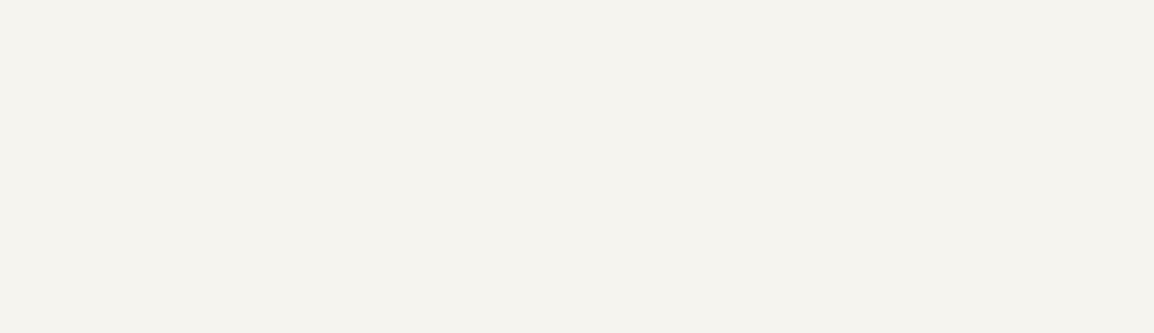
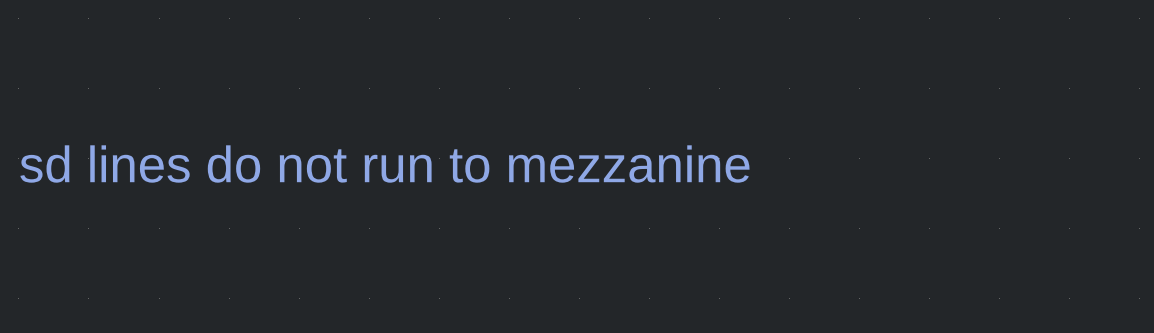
text: none -> sd lines do not run to mezzanine (384, 164)

